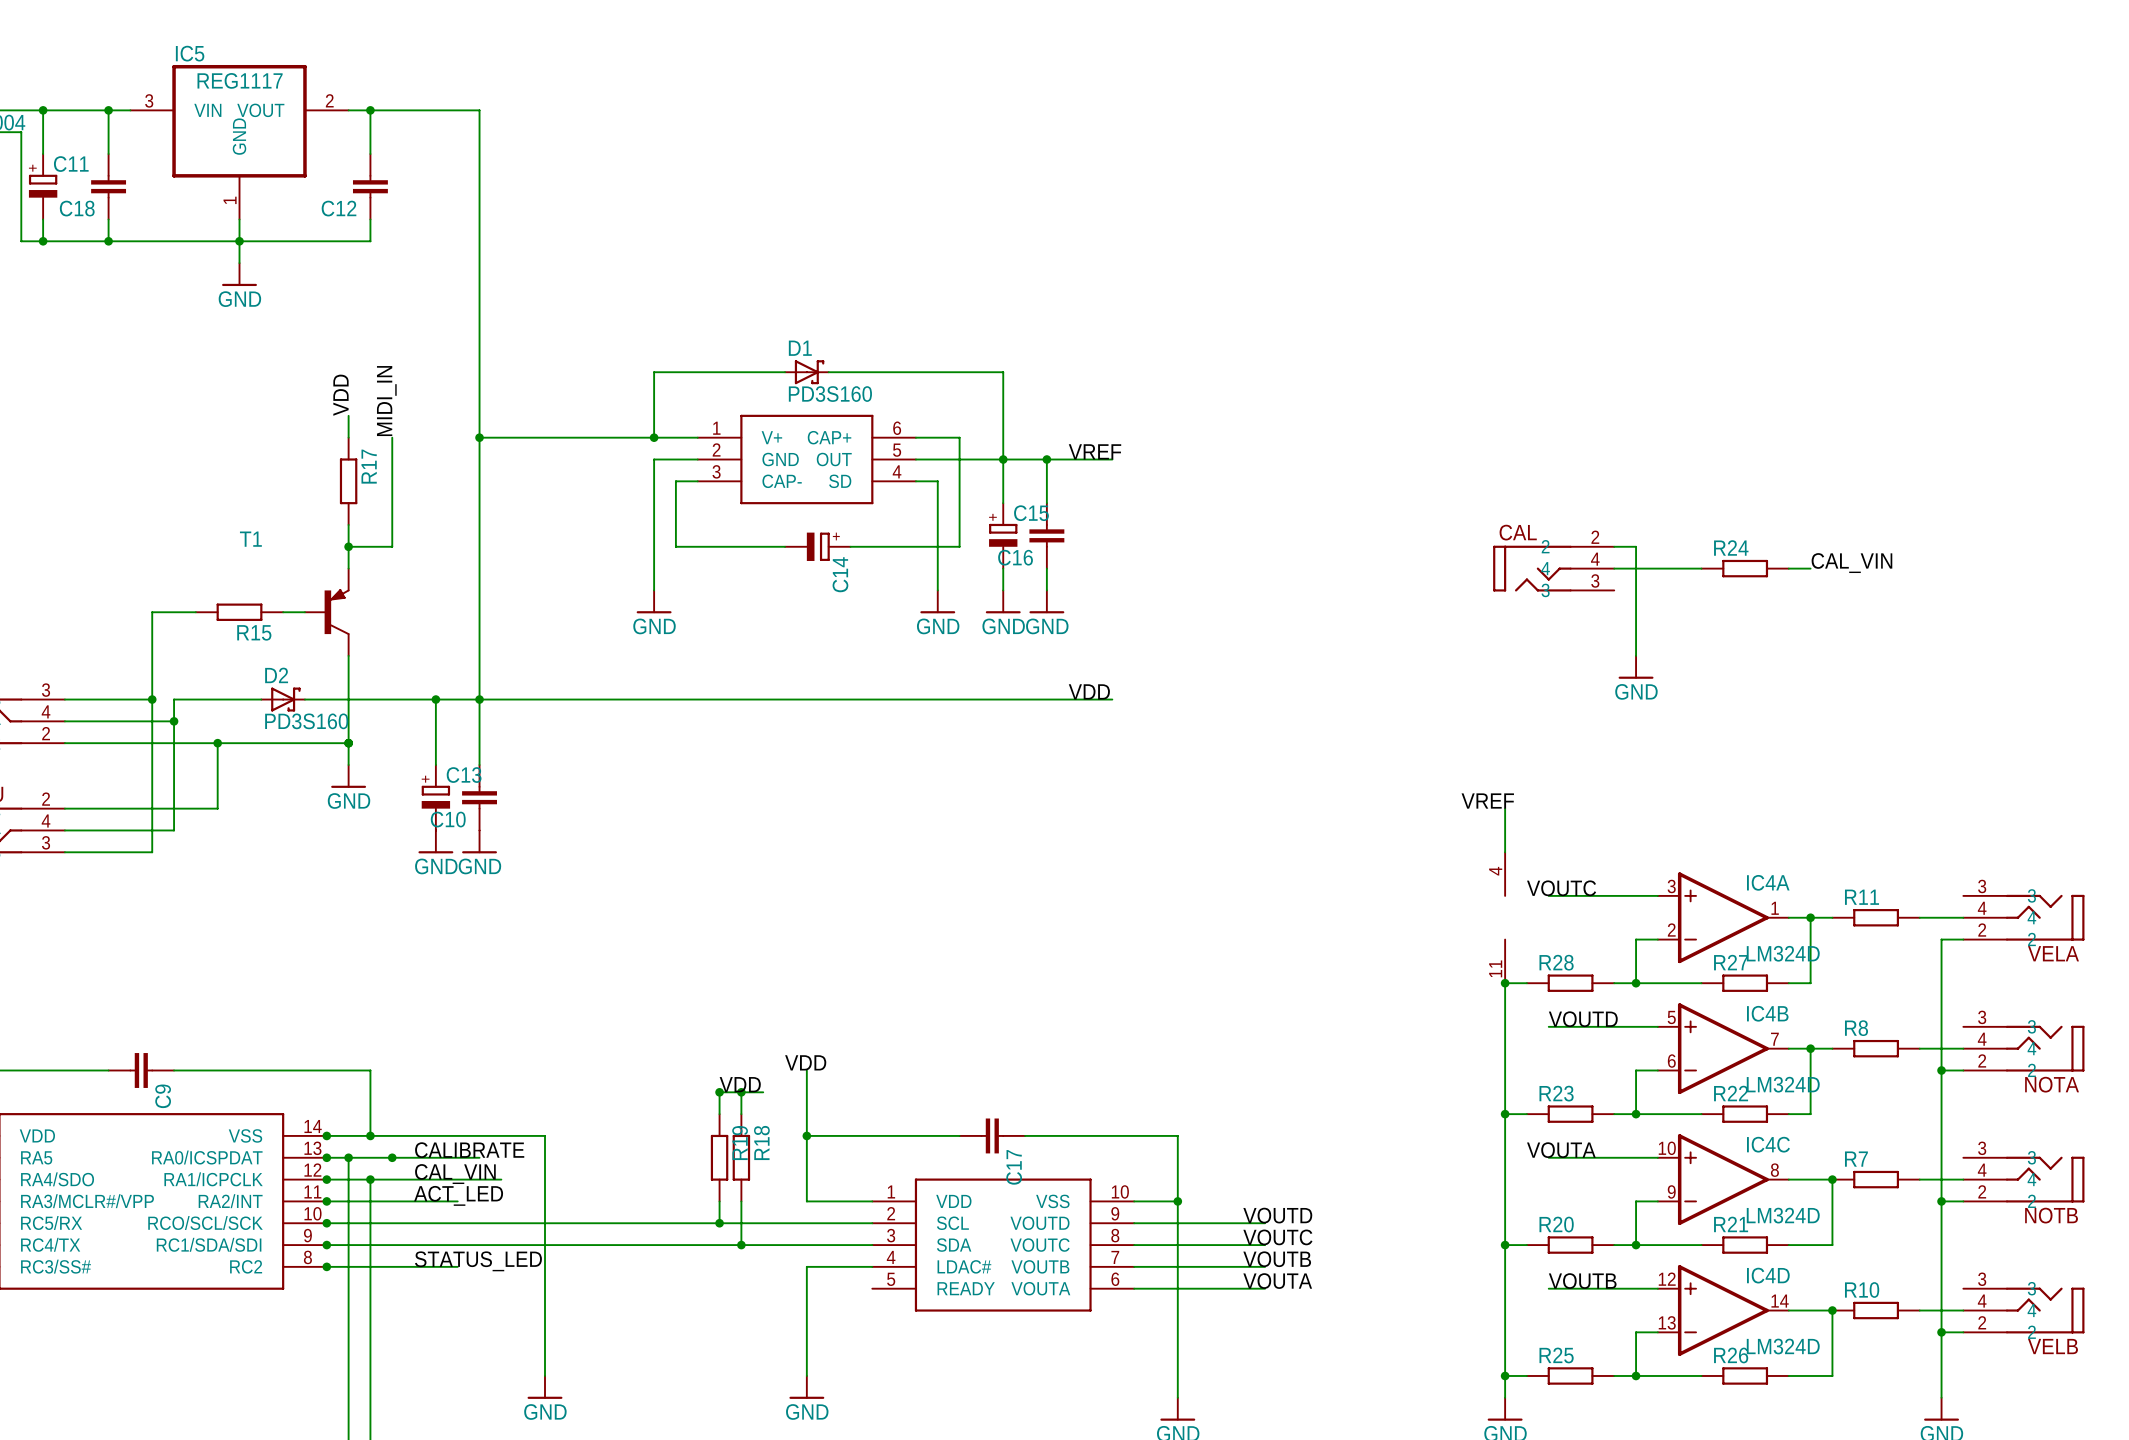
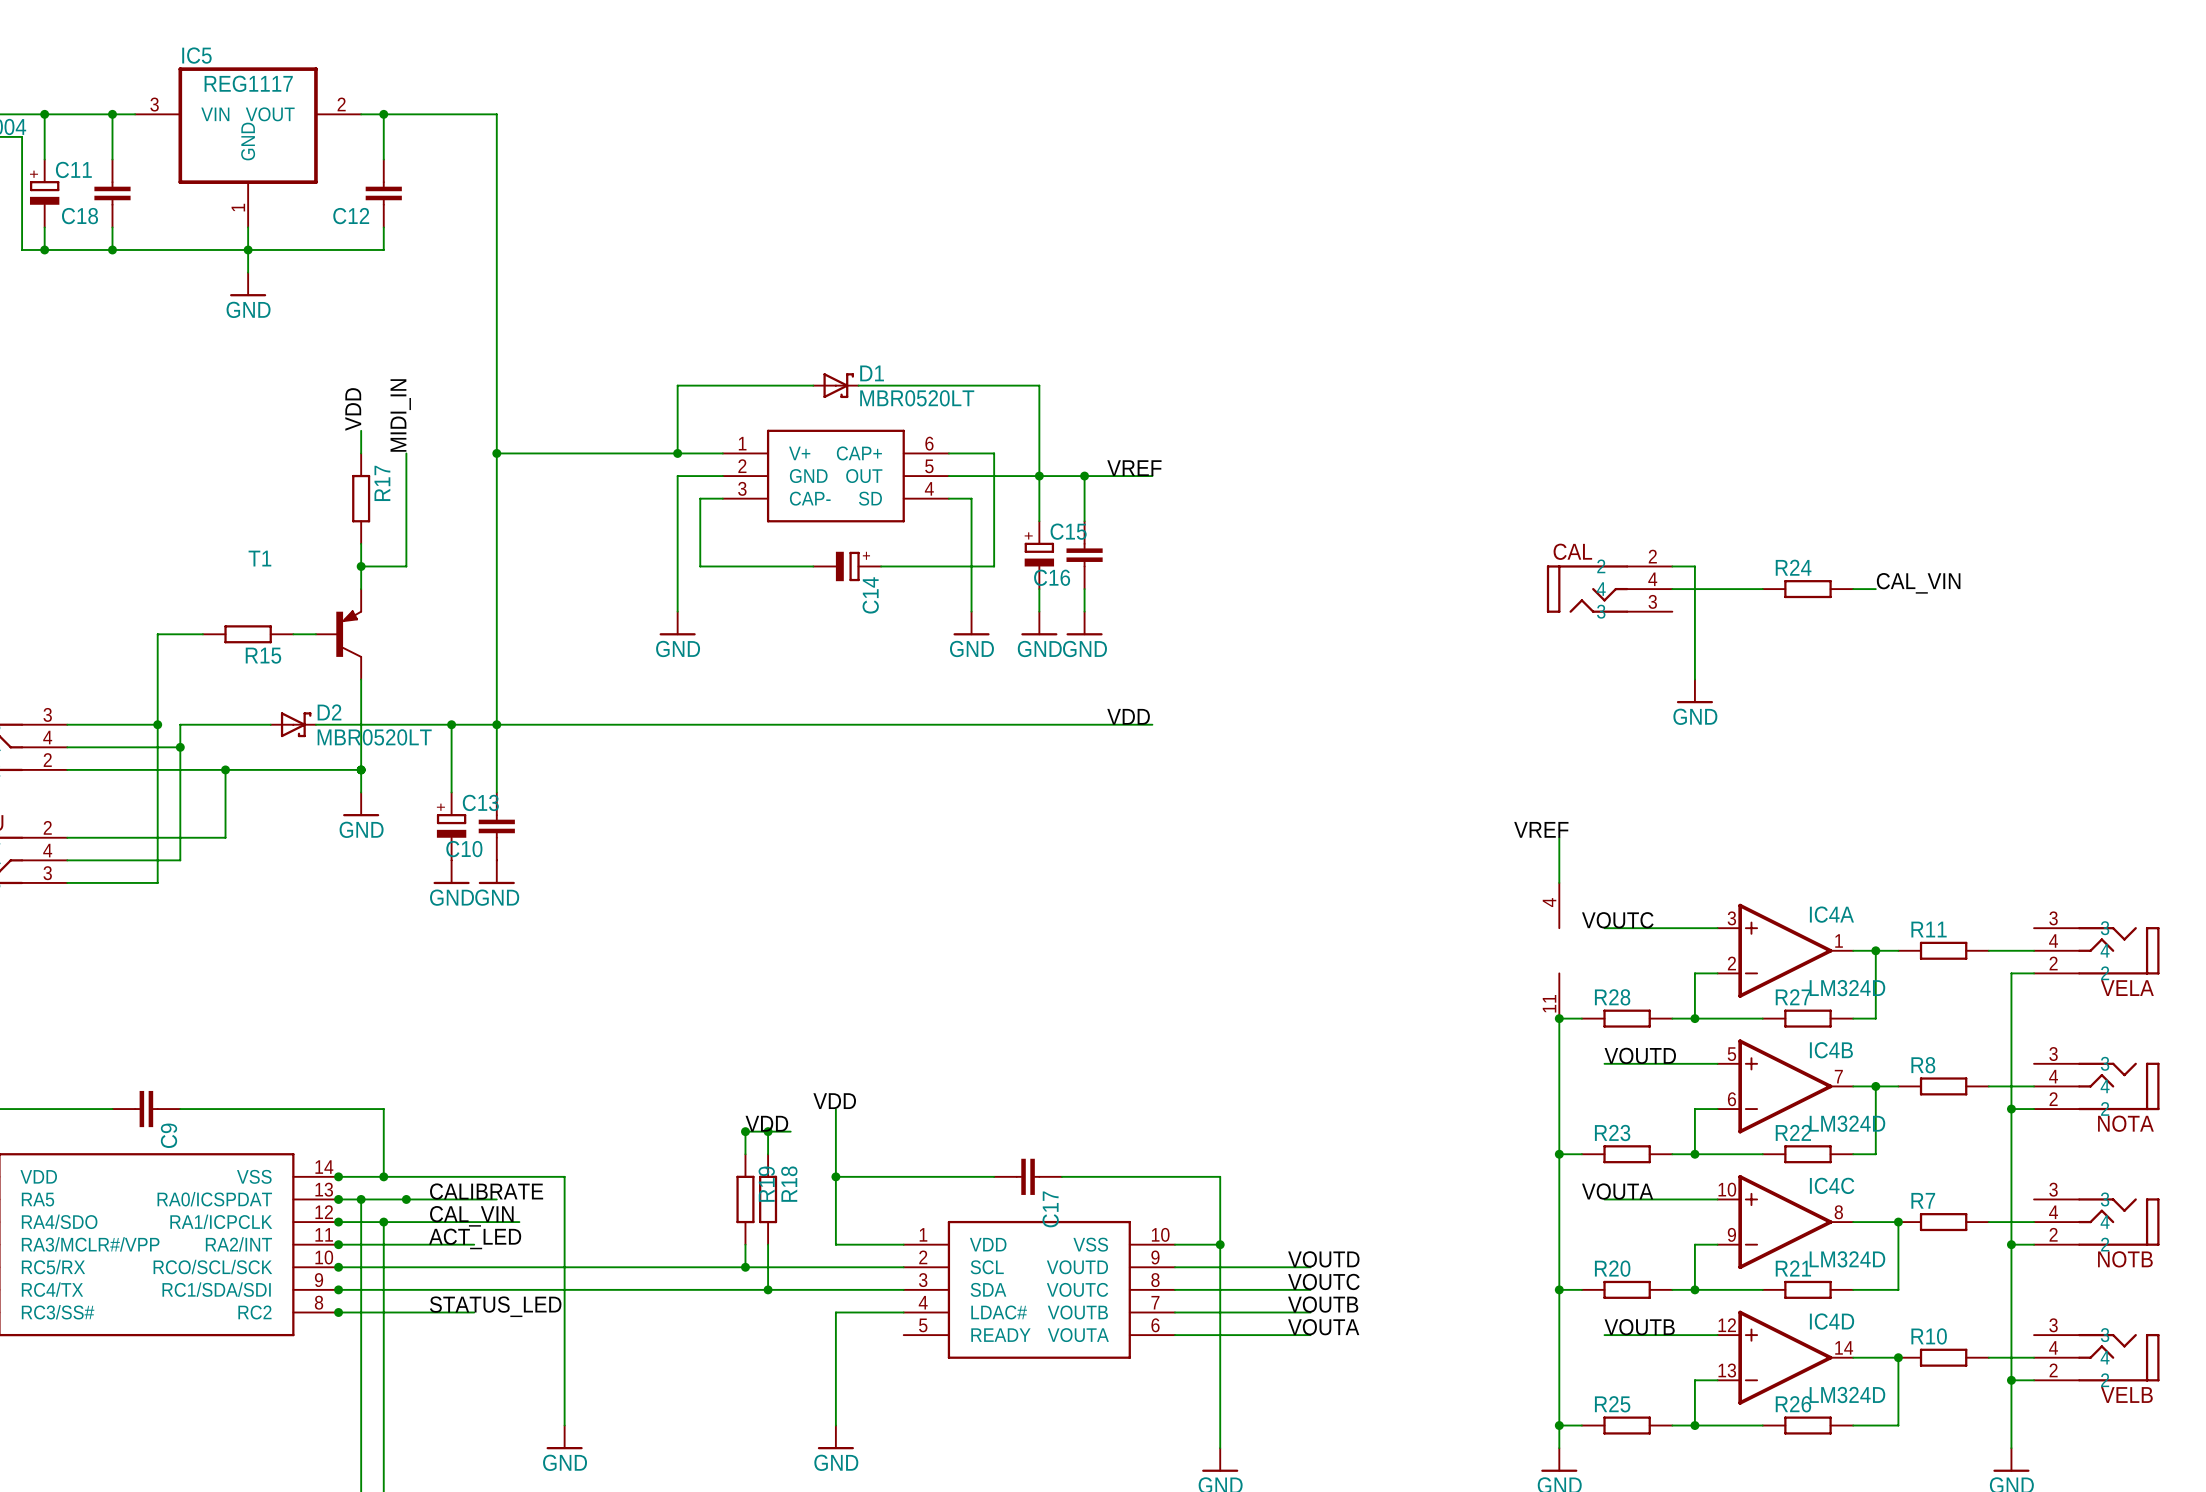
D1 name position: D1 (800, 348) -> D1 (872, 373)
D1 value: PD3S160 (830, 394) -> MBR0520LT (917, 398)
D2 name position: D2 (276, 675) -> D2 (329, 712)
D2 value: PD3S160 (306, 721) -> MBR0520LT (374, 737)

